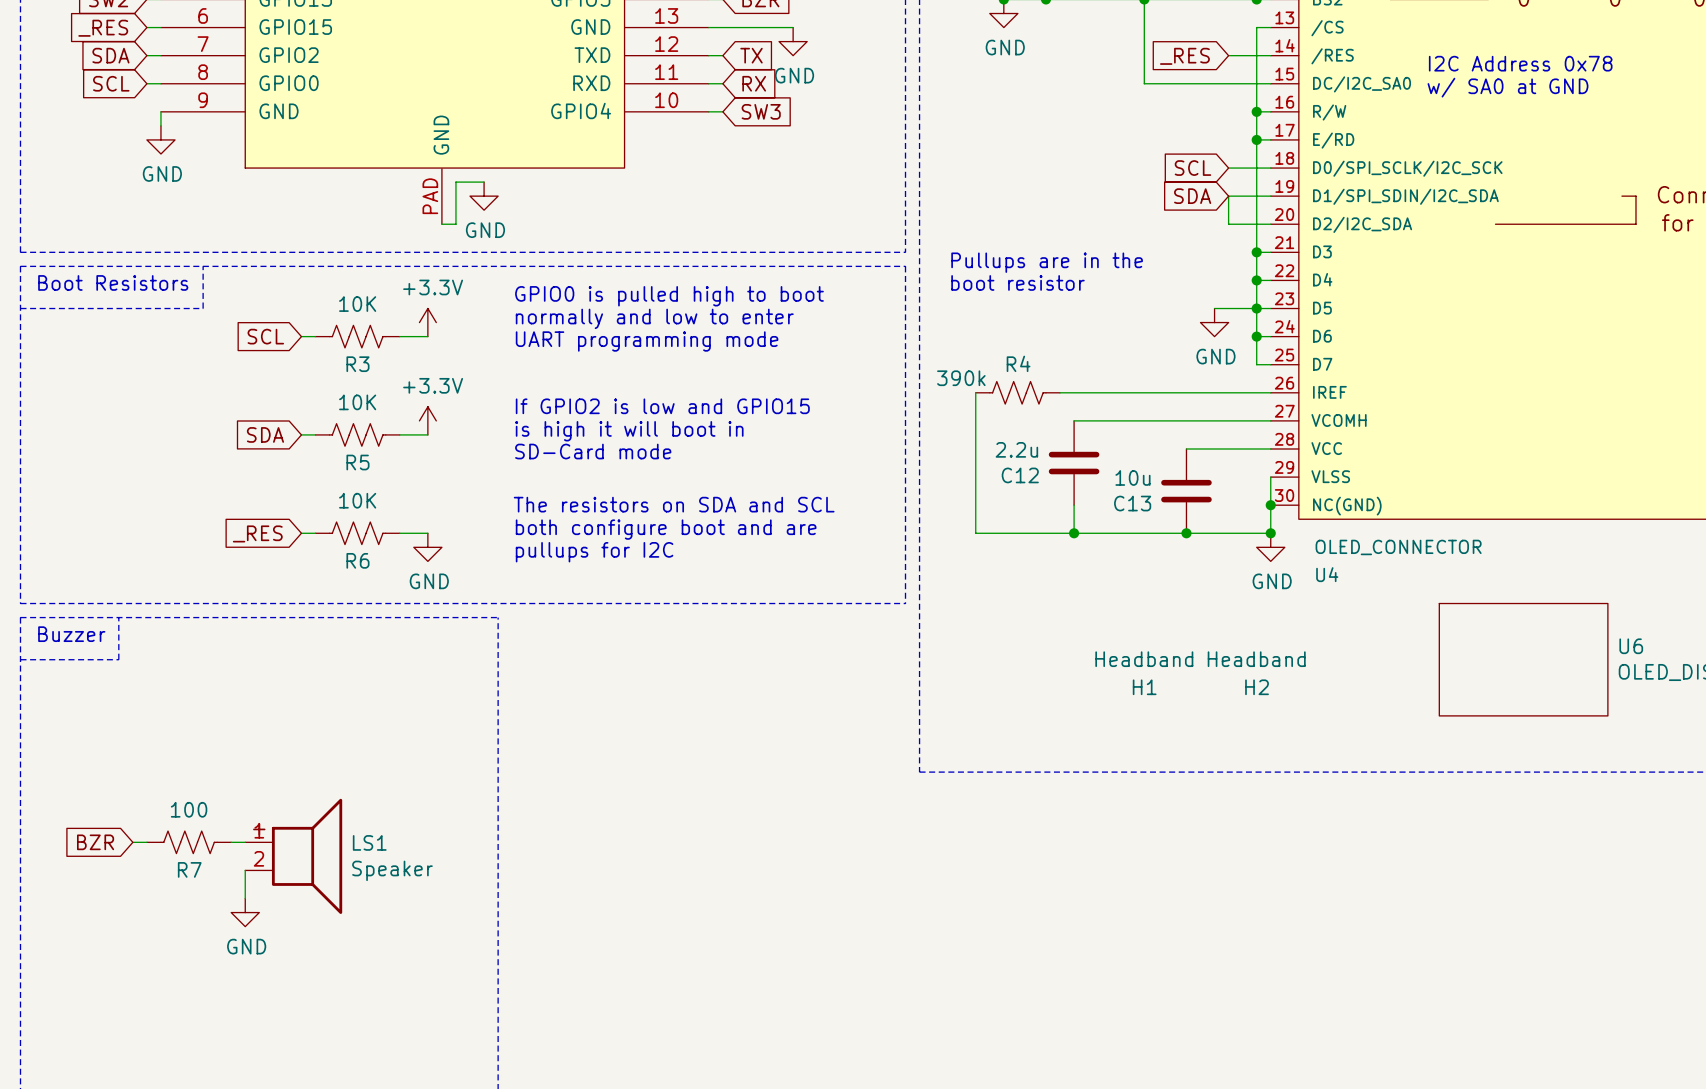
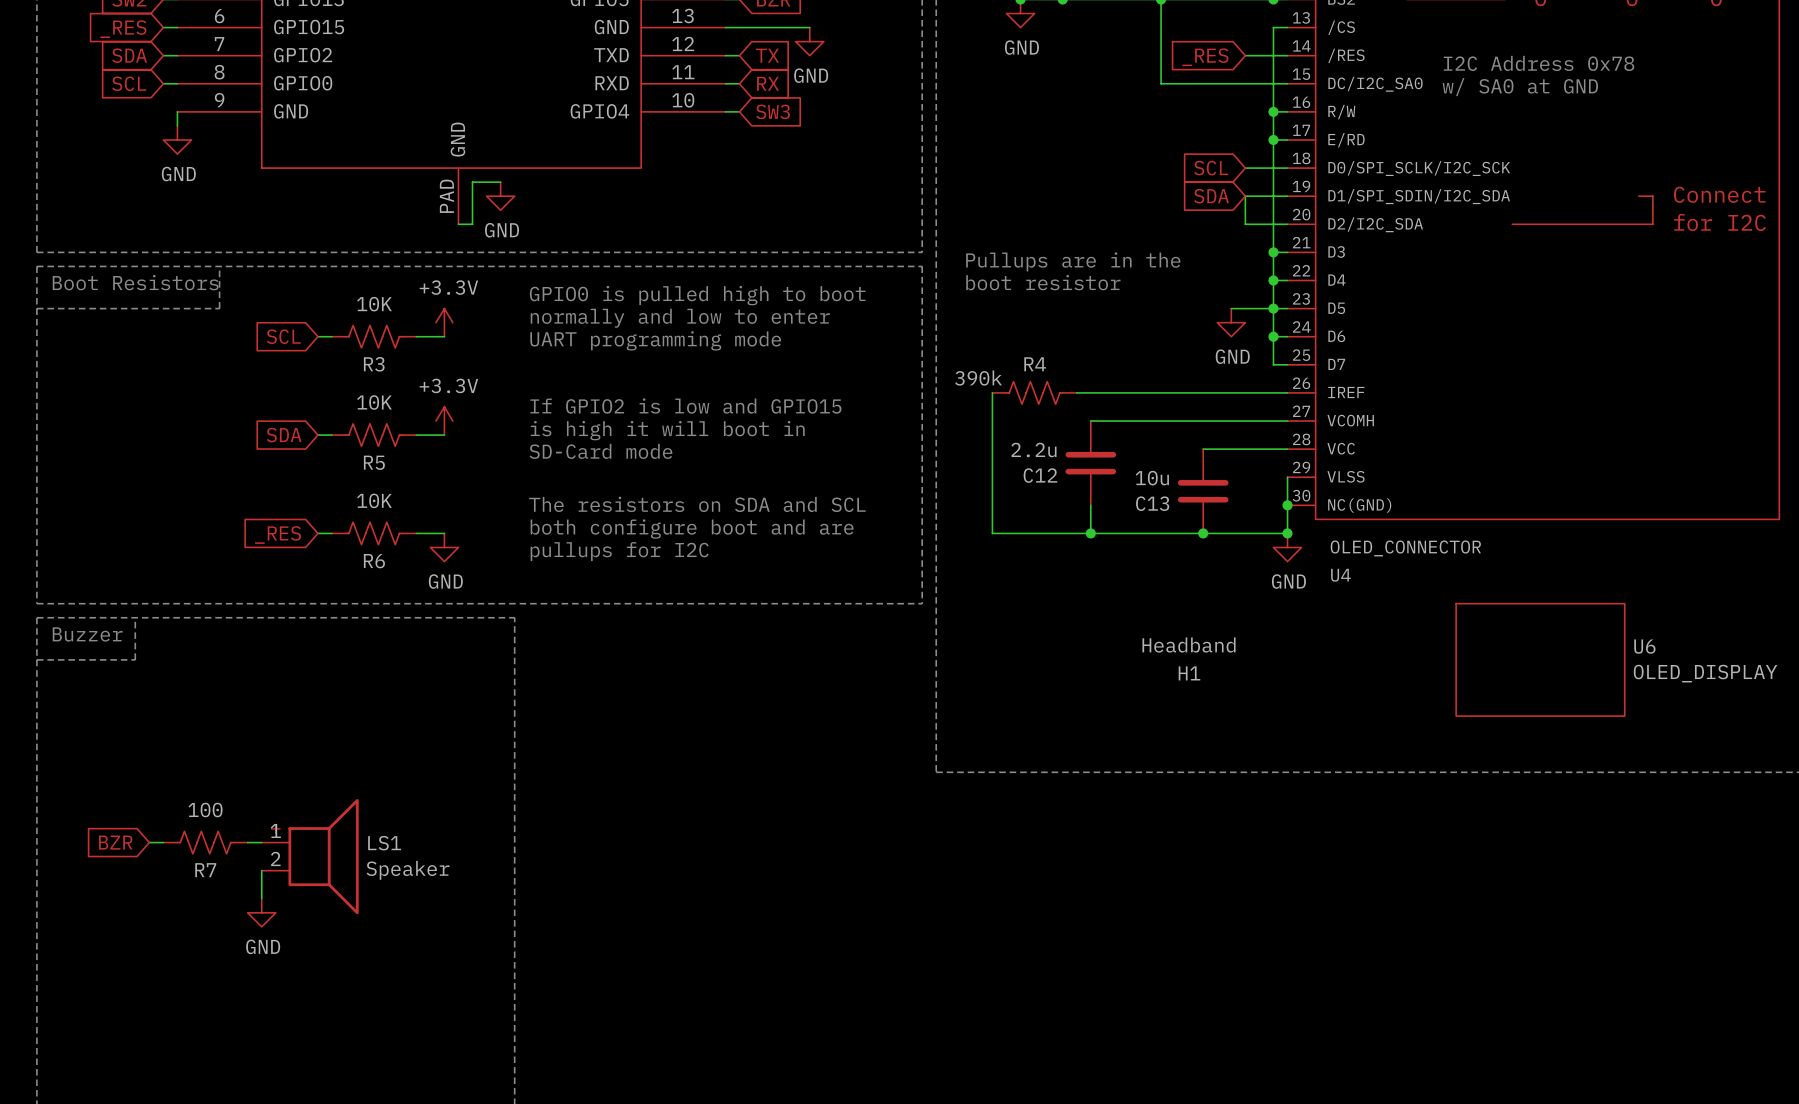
H1 position: (1144, 673) -> (1189, 658)
H2: Headband (1256, 673) -> none

